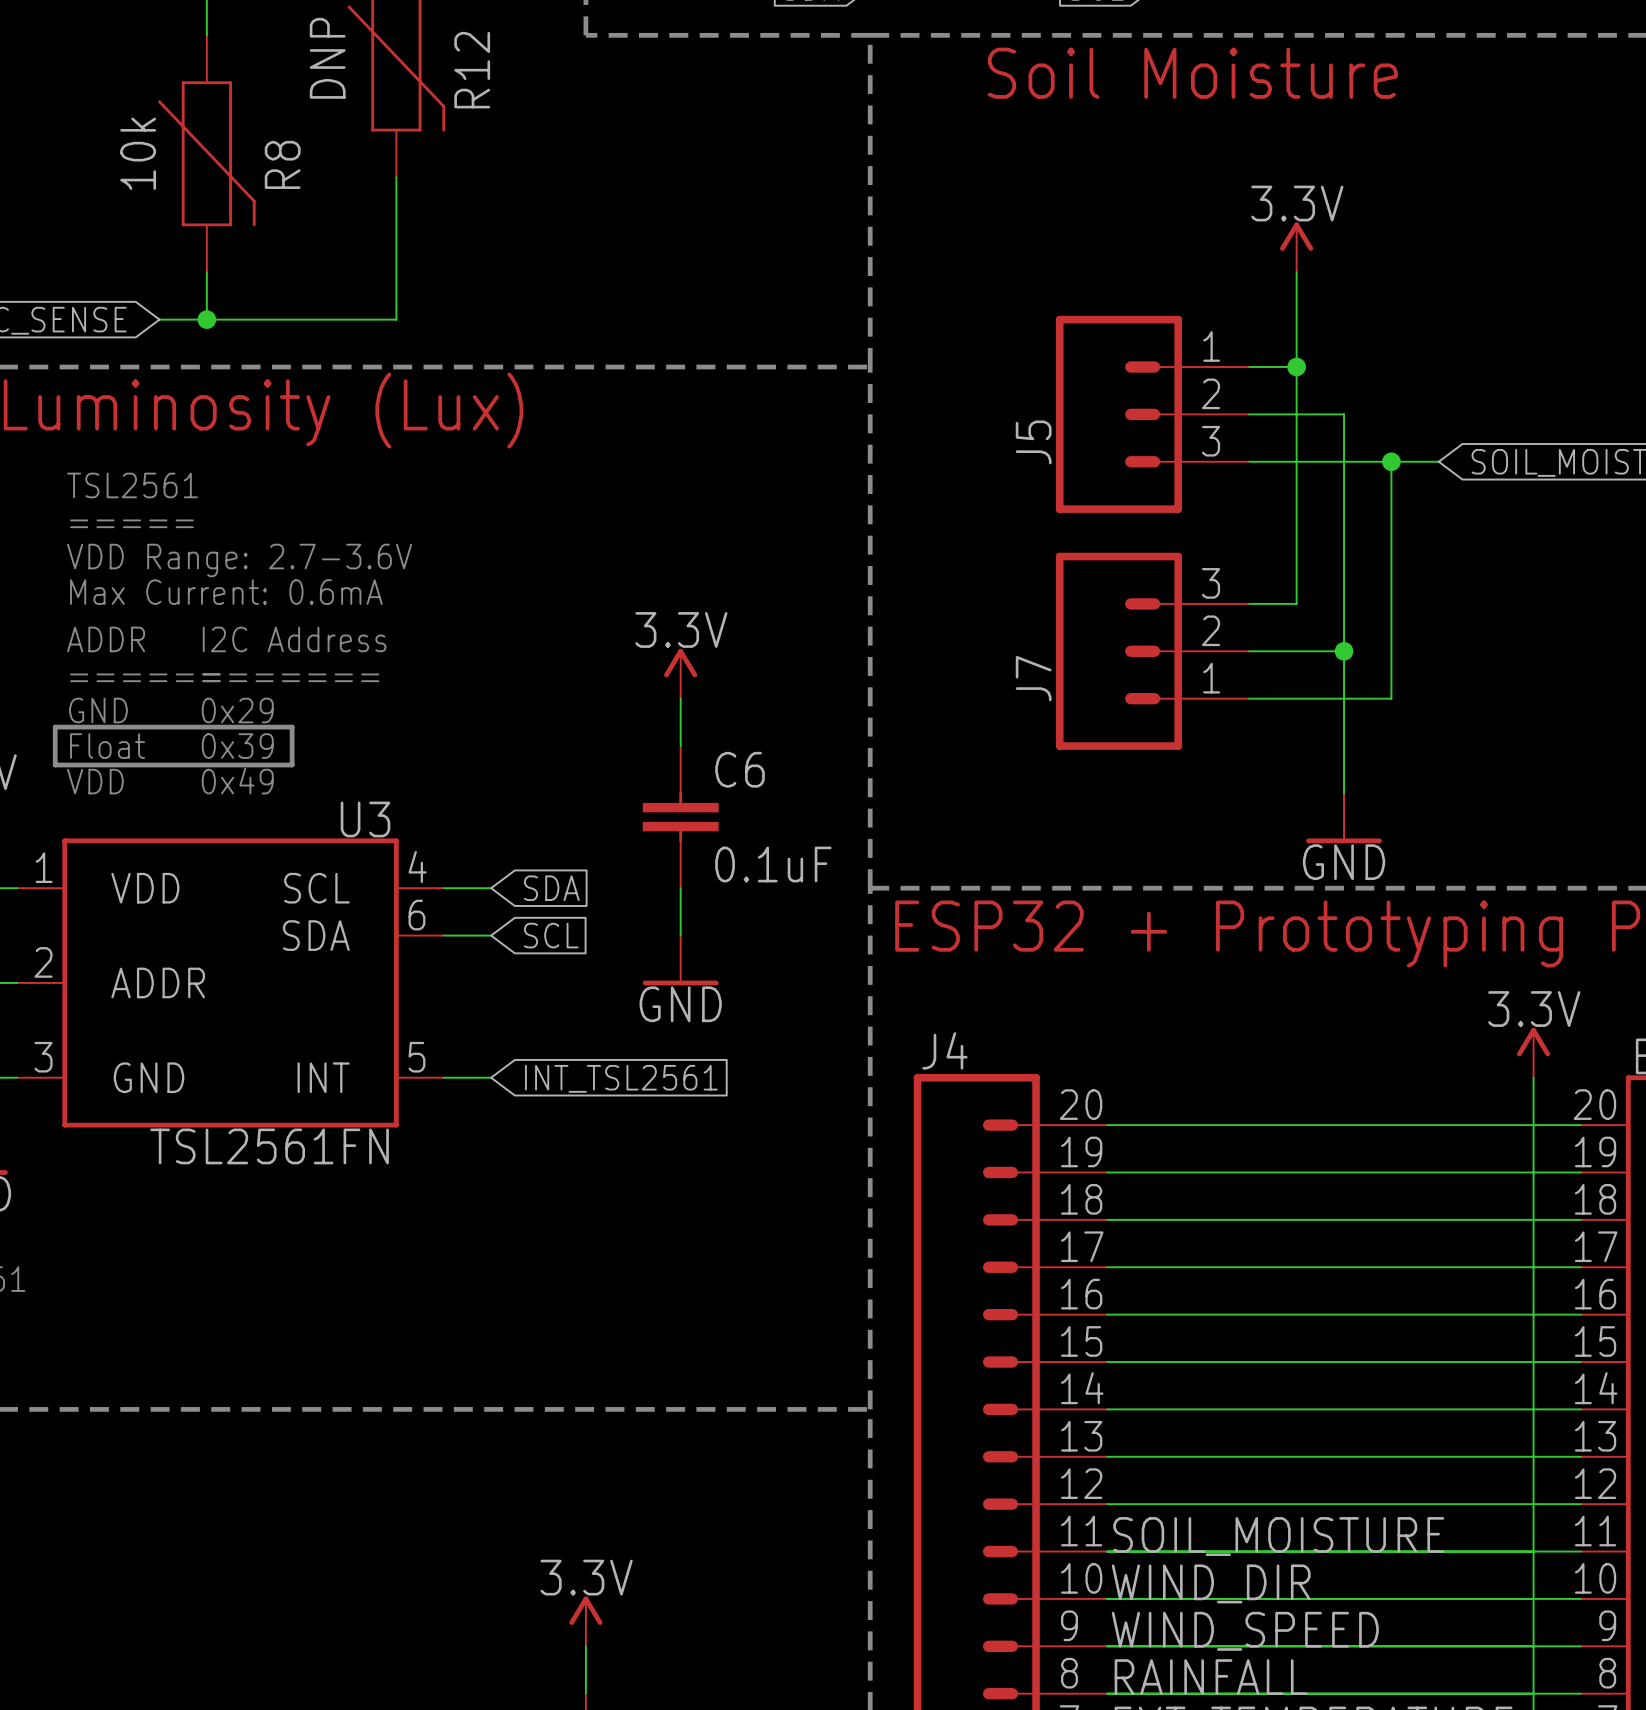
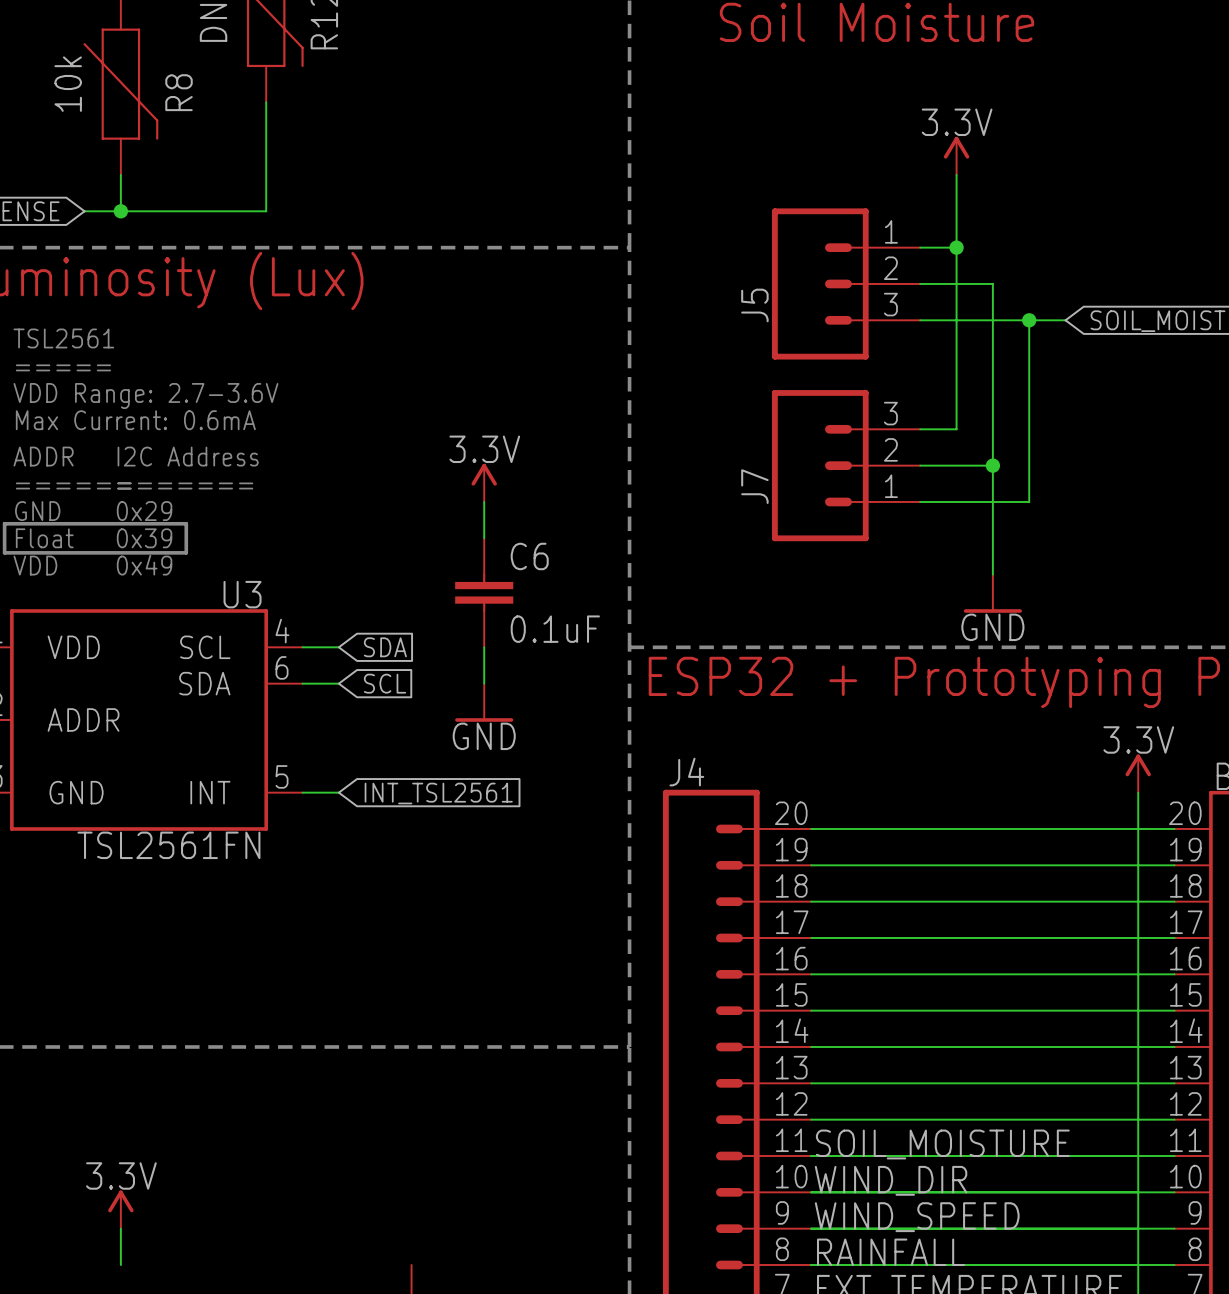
power symbol position: 3.3V (585, 1621) -> 3.3V (120, 1209)
wire: (585, 1646) (585, 1693) -> (120, 1228) (120, 1265)

